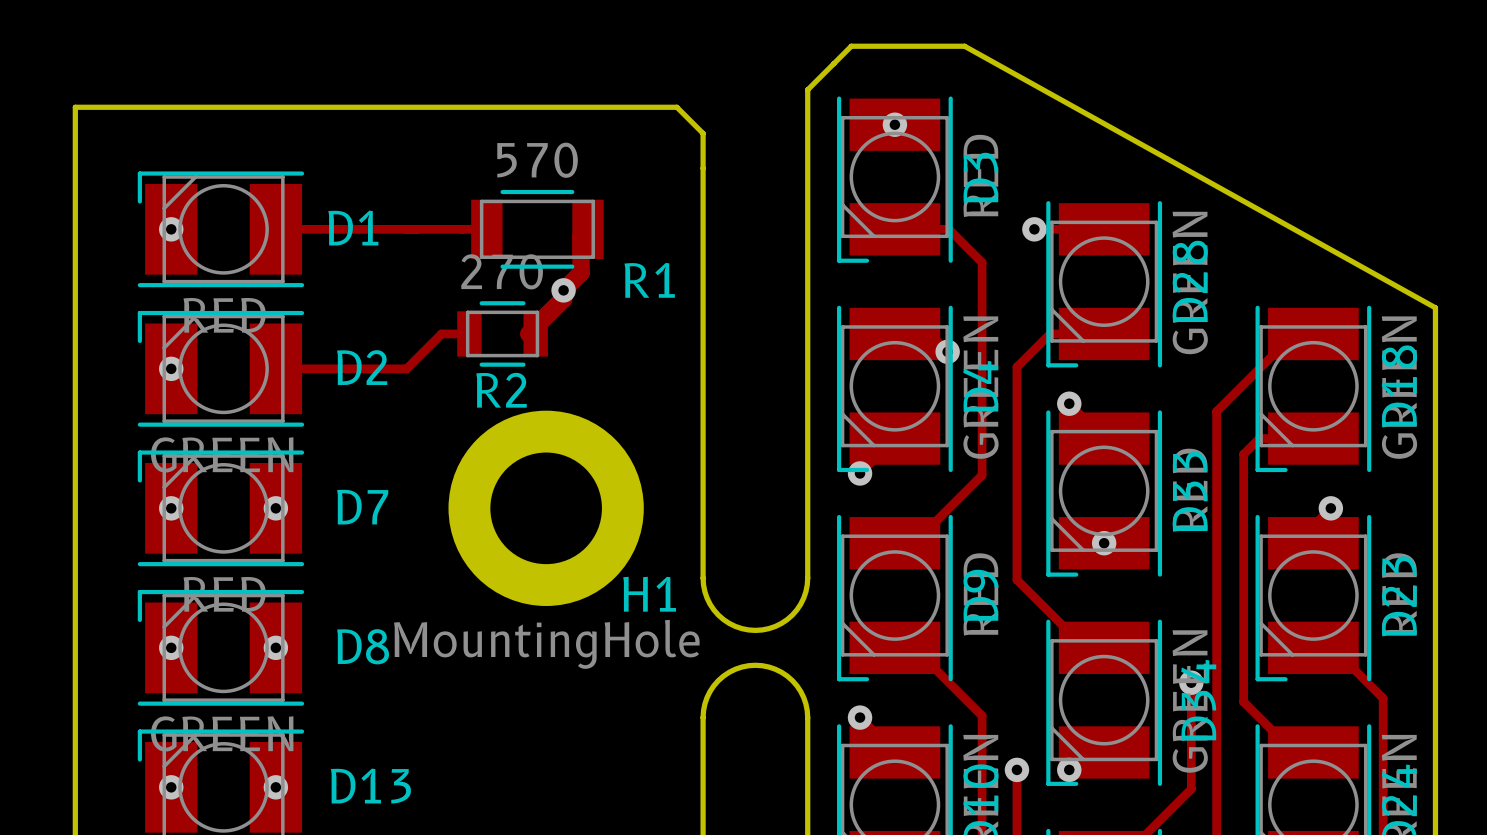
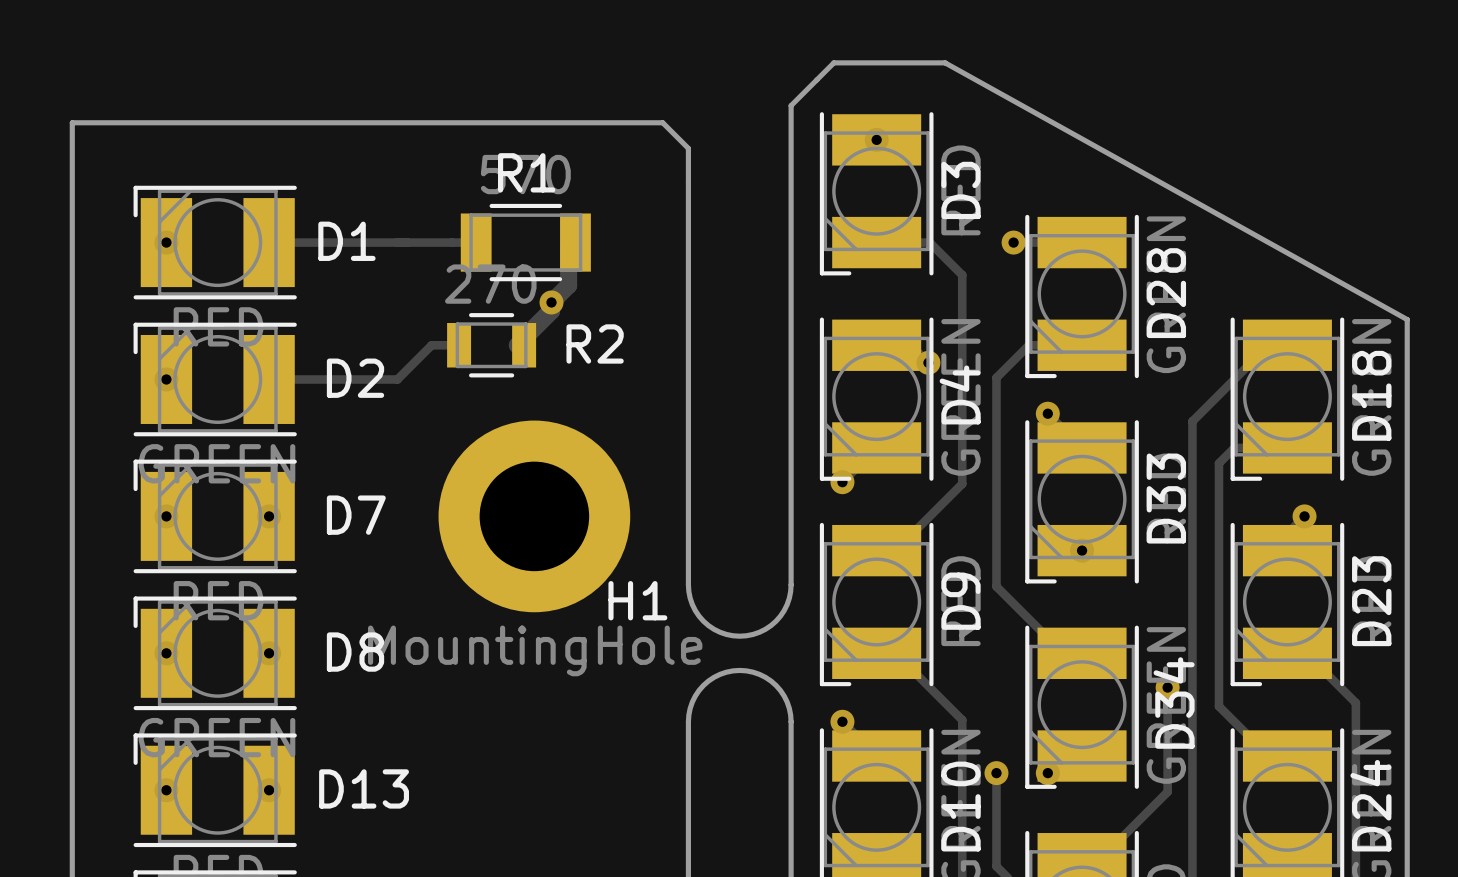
R1 name position: R1 (649, 280) -> R1 (526, 172)
R2 name position: R2 (501, 390) -> R2 (595, 343)

